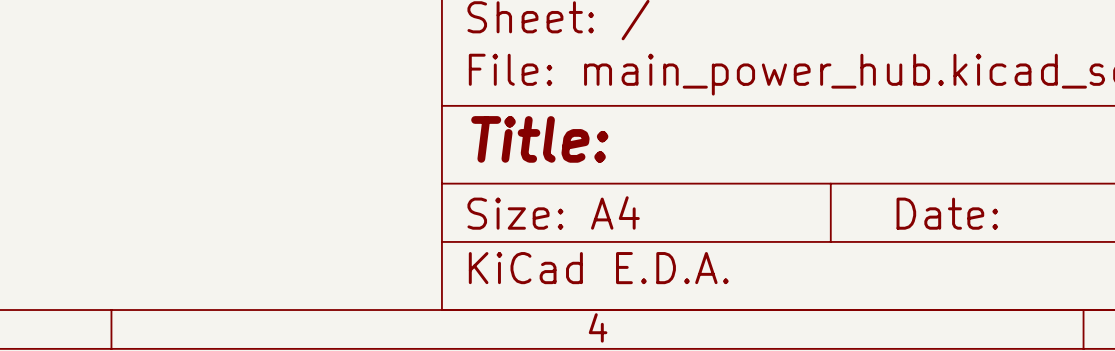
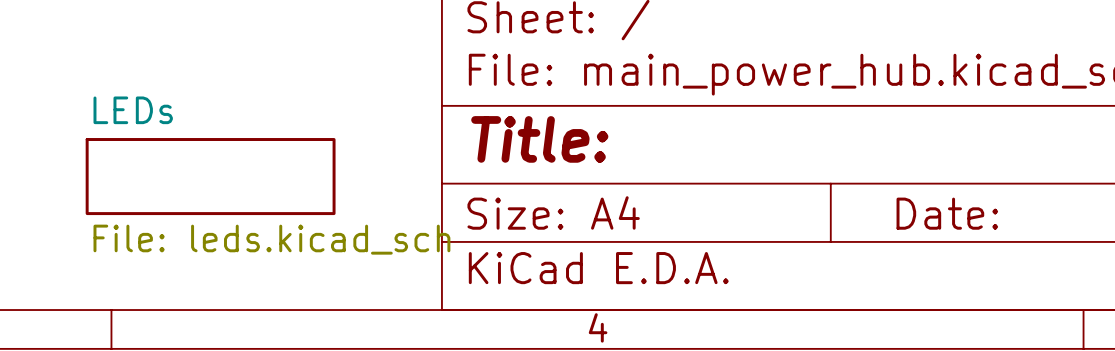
sheet LEDs: none -> File: leds.kicad_sch (210, 176)

